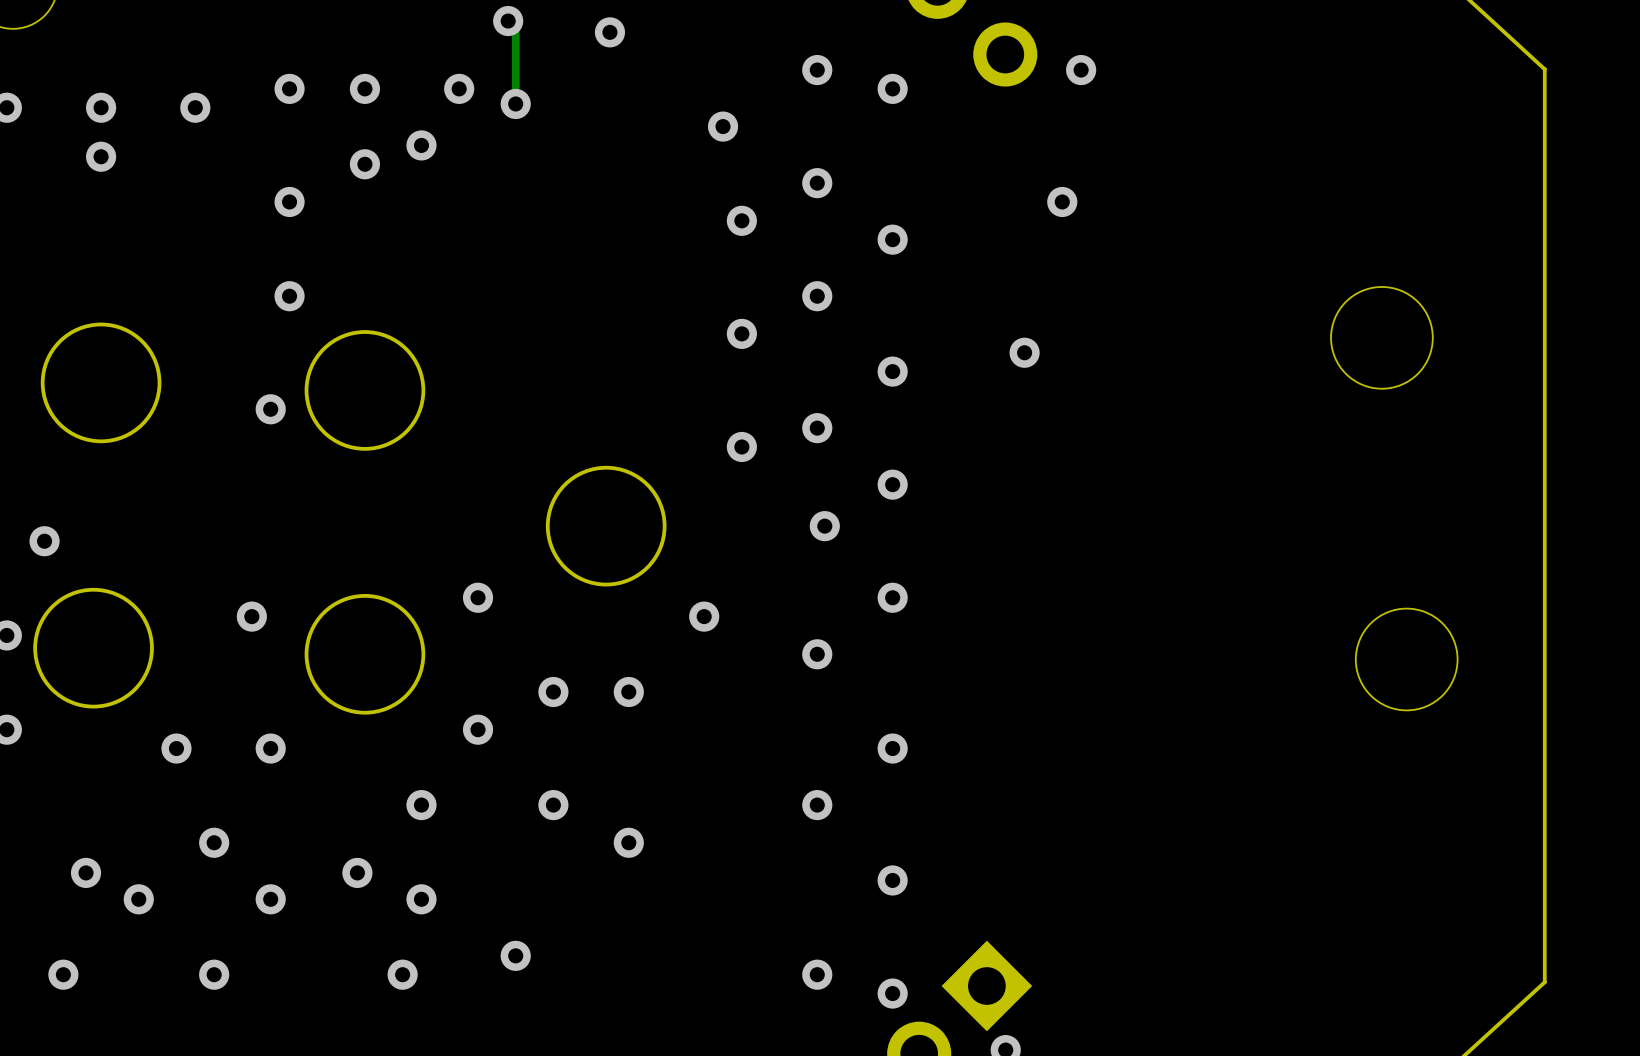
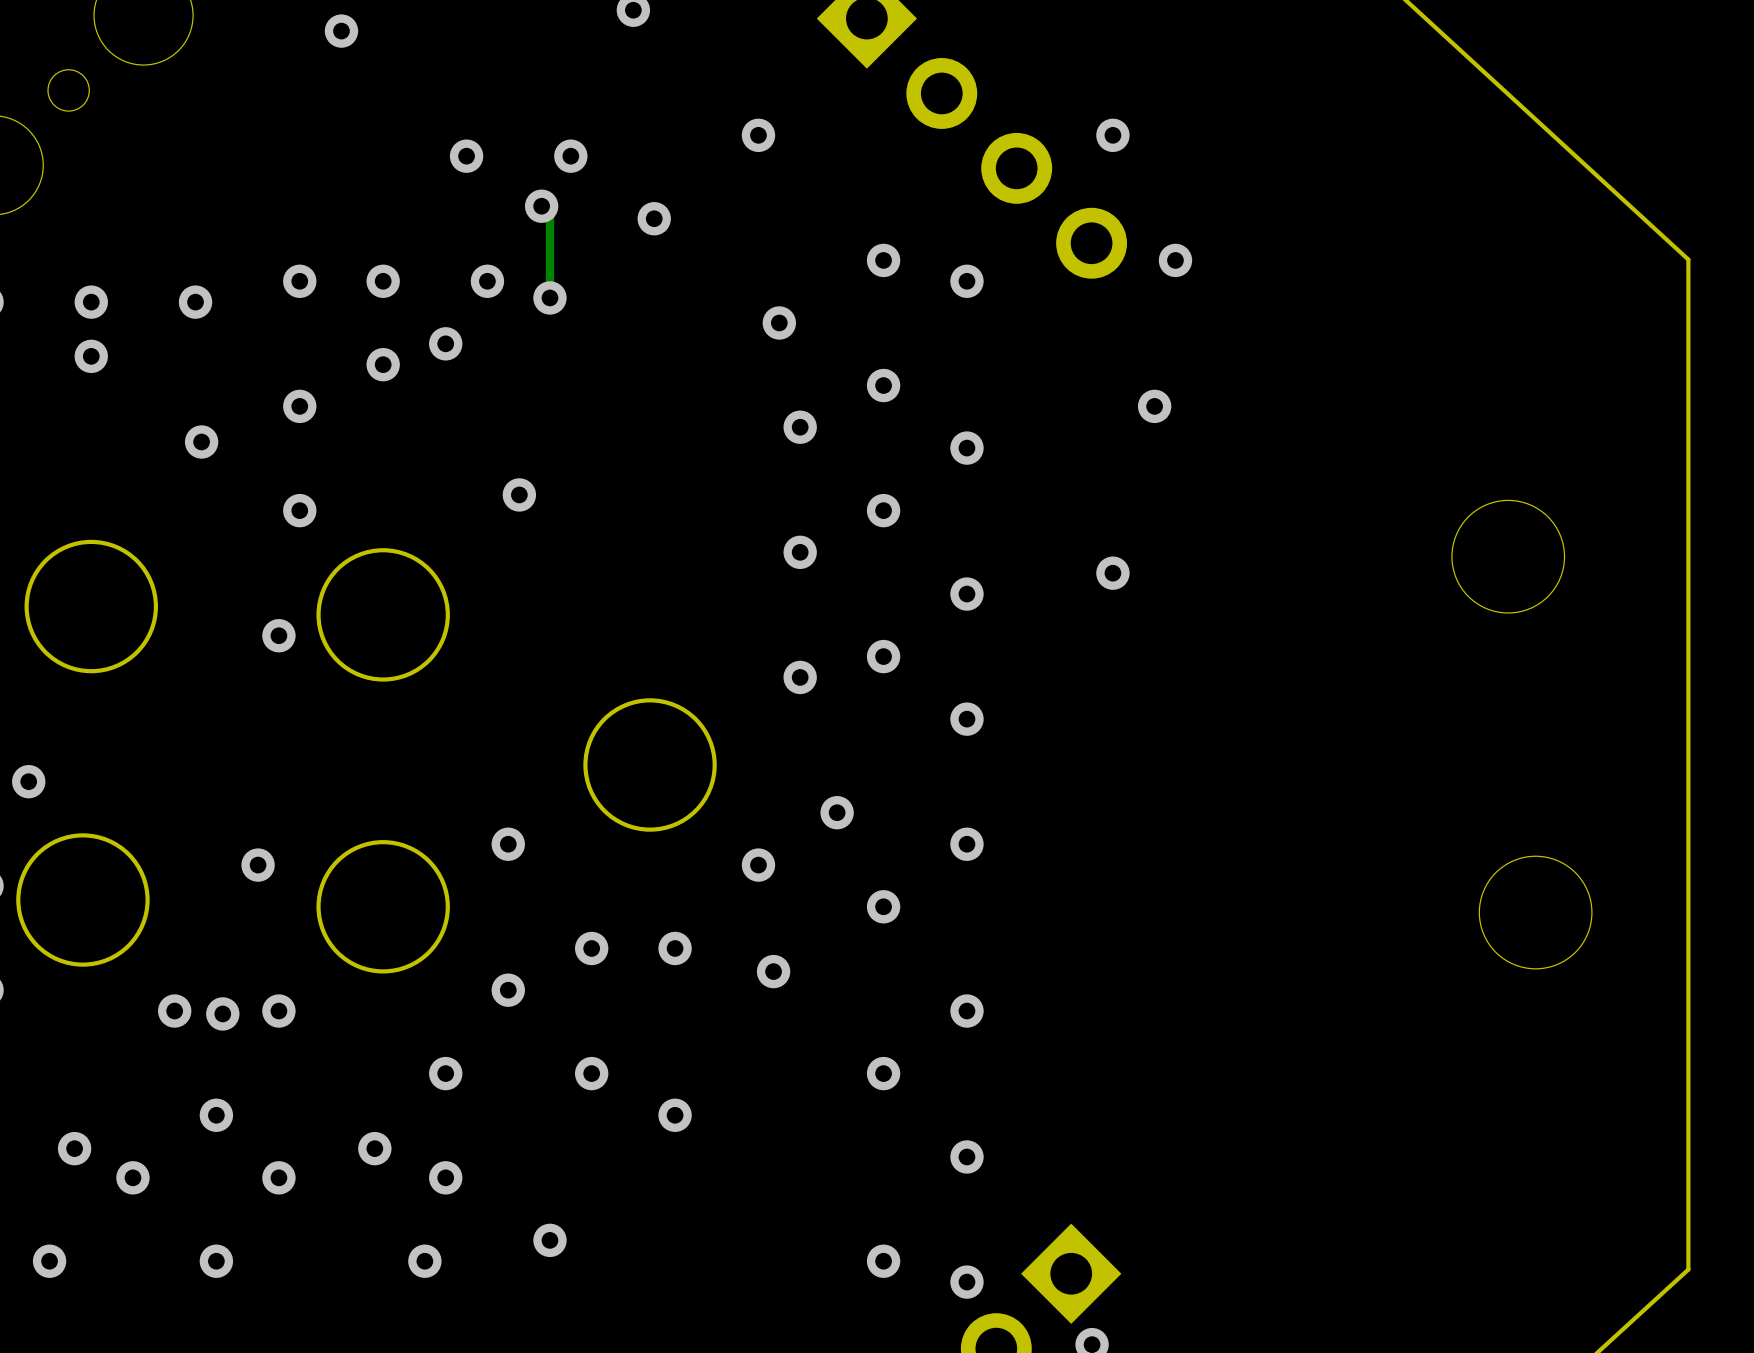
via: none -> (201, 441)
via: none -> (519, 494)
via position: (824, 526) -> (837, 812)
via: none -> (773, 971)
via: none -> (222, 1013)

